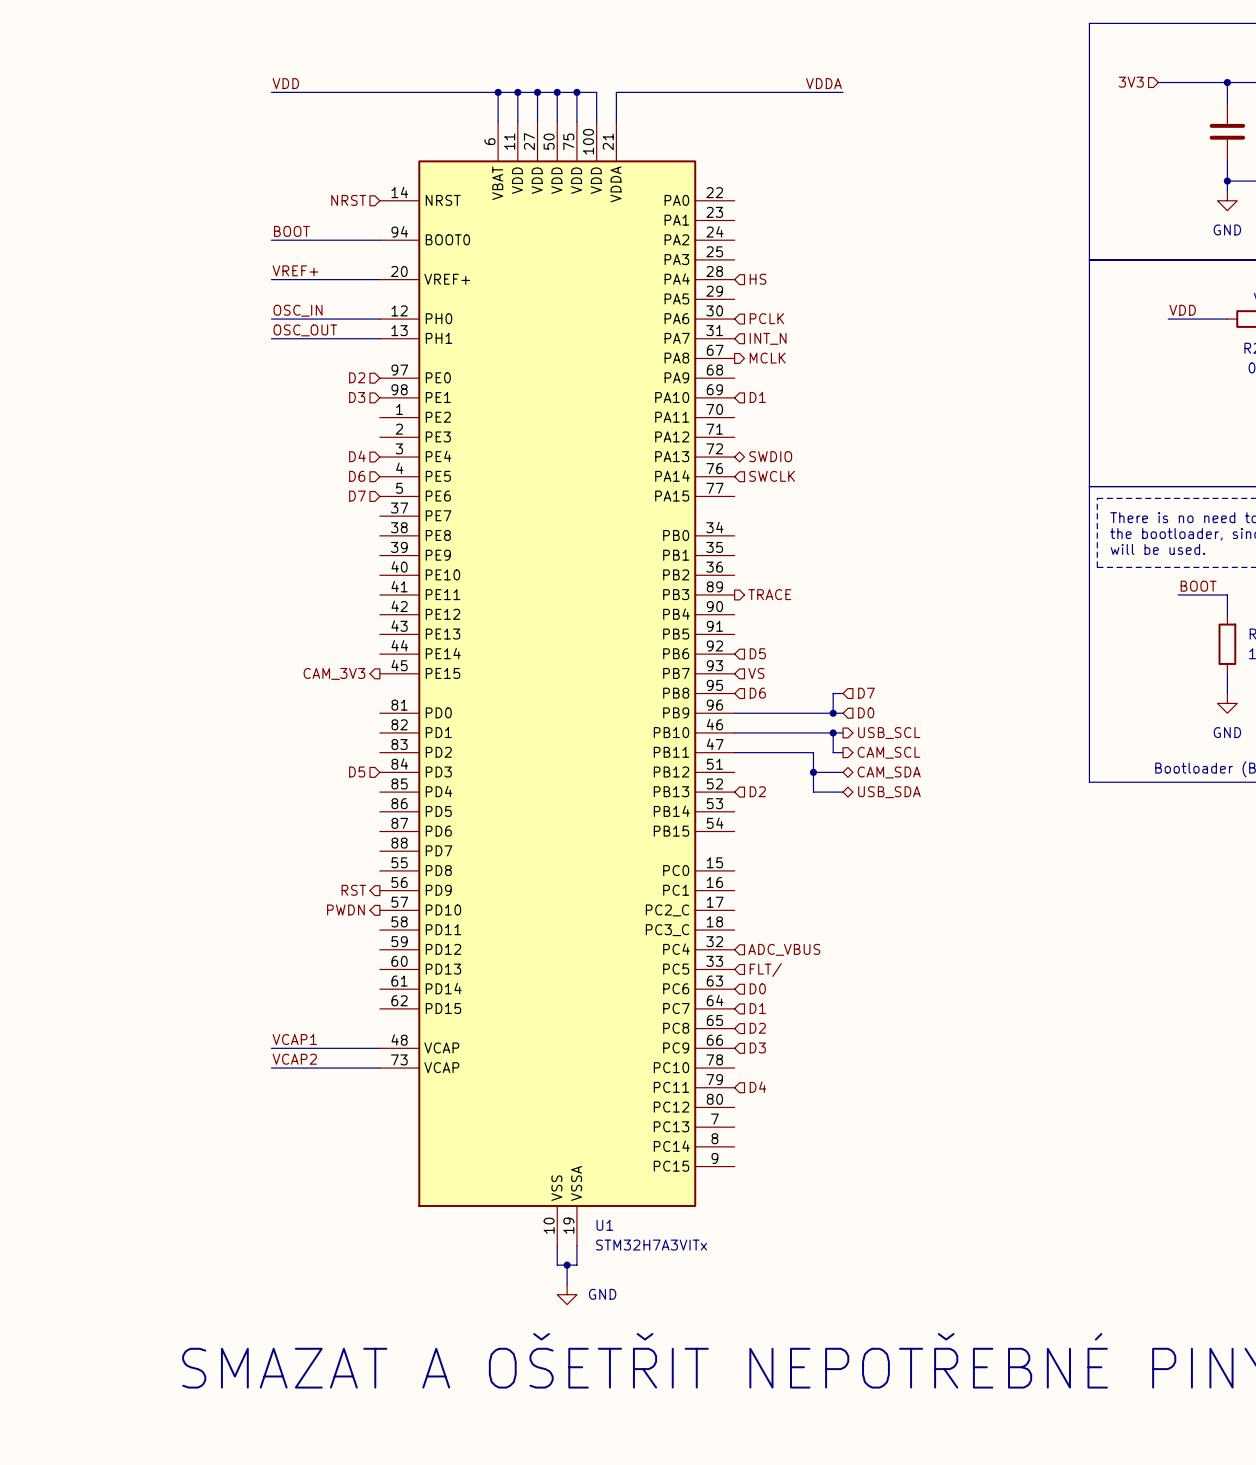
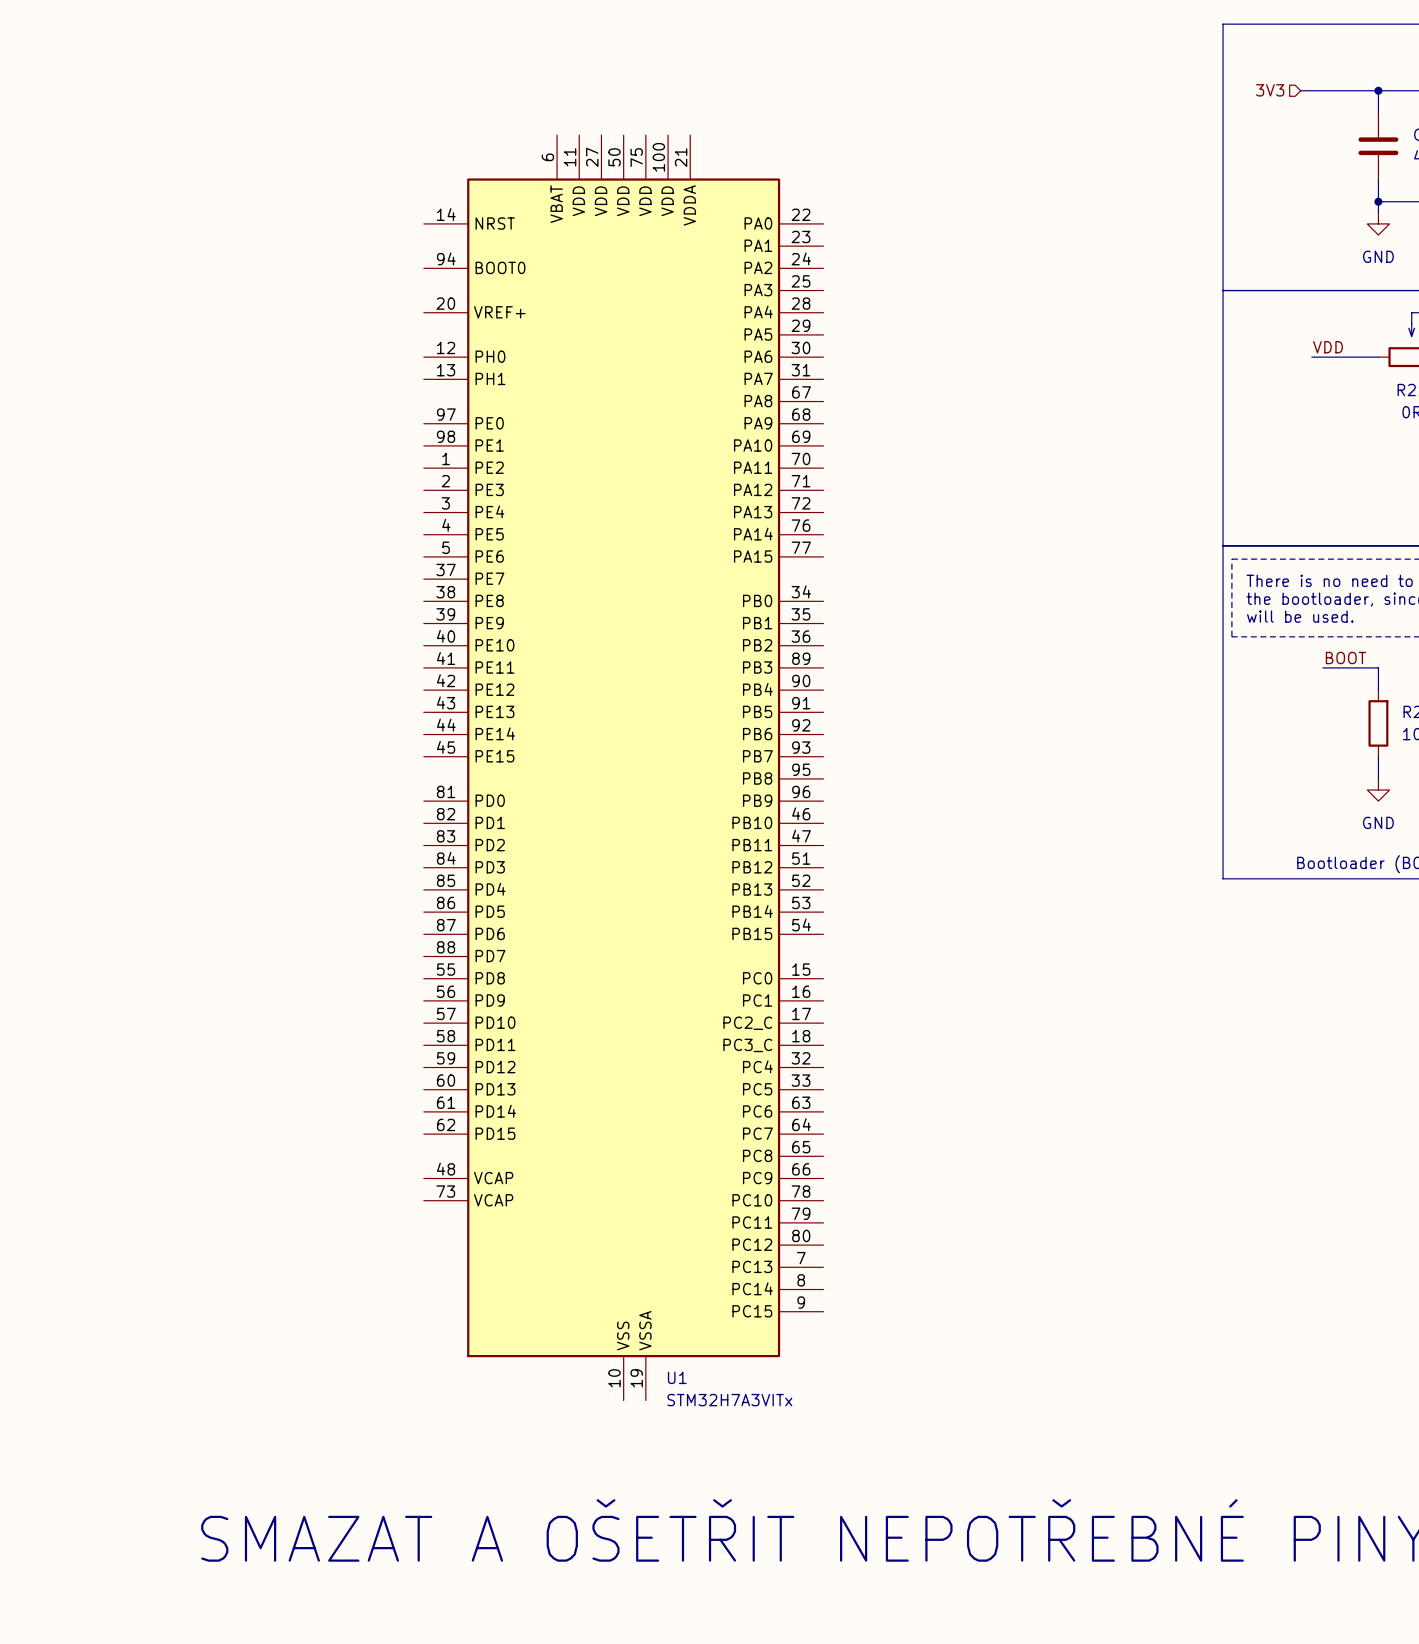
label: VDD (285, 83) -> none
label: VDDA (823, 83) -> none
wire: (271, 92) (596, 92) (596, 121) -> none
wire: (498, 92) (498, 121) -> none
junction: (498, 92) -> none
wire: (517, 92) (517, 121) -> none
junction: (517, 92) -> none
wire: (537, 92) (537, 121) -> none
junction: (537, 92) -> none
wire: (557, 92) (557, 121) -> none
junction: (557, 92) -> none
wire: (576, 92) (576, 121) -> none
junction: (576, 92) -> none
wire: (843, 92) (616, 92) (616, 121) -> none
hierarchical label: NRST (348, 200) -> none
label: BOOT (291, 231) -> none
wire: (271, 240) (379, 240) -> none
label: VREF+ (295, 270) -> none
wire: (271, 279) (379, 279) -> none
hierarchical label: HS (758, 279) -> none
label: OSC_IN (298, 310) -> none
hierarchical label: PCLK (766, 318) -> none
wire: (271, 319) (379, 319) -> none
label: OSC_OUT (305, 330) -> none
wire: (271, 338) (379, 338) -> none
hierarchical label: INT_N (768, 338) -> none
hierarchical label: MCLK (767, 358) -> none
hierarchical label: D2 (357, 377) -> none
hierarchical label: D3 (357, 397) -> none
hierarchical label: D1 (757, 397) -> none
hierarchical label: D4 (357, 456) -> none
hierarchical label: SWDIO (770, 456) -> none
hierarchical label: D6 (357, 476) -> none
hierarchical label: SWCLK (772, 476) -> none
hierarchical label: D7 (357, 496) -> none
hierarchical label: TRACE (769, 594) -> none
hierarchical label: D5 (757, 653) -> none
hierarchical label: CAM_3V3 (334, 673) -> none
hierarchical label: VS (756, 673) -> none
hierarchical label: D6 (757, 693) -> none
wire: (843, 693) (833, 693) (833, 713) -> none
hierarchical label: D7 (866, 693) -> none
hierarchical label: D0 (866, 712) -> none
wire: (734, 713) (843, 713) -> none
junction: (833, 713) -> none
wire: (734, 732) (843, 732) -> none
wire: (833, 732) (833, 752) (843, 752) -> none
junction: (833, 732) -> none
hierarchical label: USB_SCL (889, 733) -> none
wire: (734, 752) (813, 752) (813, 792) (843, 792) -> none
hierarchical label: CAM_SCL (888, 752) -> none
hierarchical label: D5 (357, 772) -> none
wire: (813, 772) (843, 772) -> none
junction: (813, 772) -> none
hierarchical label: CAM_SDA (889, 772) -> none
hierarchical label: D2 (757, 791) -> none
hierarchical label: USB_SDA (889, 792) -> none
hierarchical label: RST (353, 890) -> none
hierarchical label: PWDN (345, 909) -> none
hierarchical label: ADC_VBUS (784, 949) -> none
hierarchical label: FLT/ (765, 970) -> none
hierarchical label: D0 (757, 988) -> none
hierarchical label: D1 (757, 1008) -> none
hierarchical label: D2 (757, 1028) -> none
label: VCAP1 (294, 1039) -> none
hierarchical label: D3 (757, 1047) -> none
wire: (271, 1048) (379, 1048) -> none
label: VCAP2 (294, 1059) -> none
wire: (271, 1068) (379, 1068) -> none
hierarchical label: D4 (758, 1087) -> none
wire: (557, 1245) (557, 1265) (576, 1265) (576, 1245) -> none
wire: (567, 1265) (567, 1284) -> none
junction: (567, 1265) -> none
power symbol: GND (567, 1294) -> none

